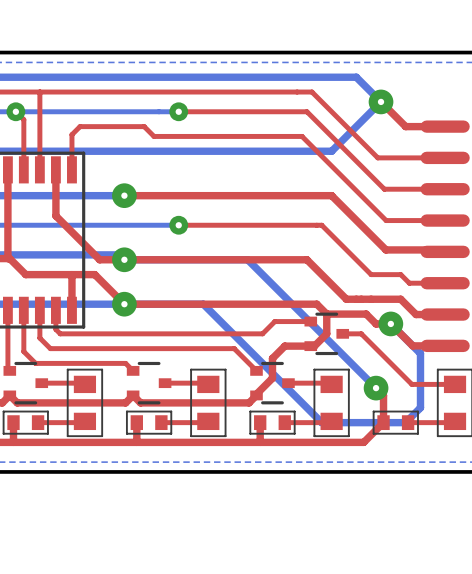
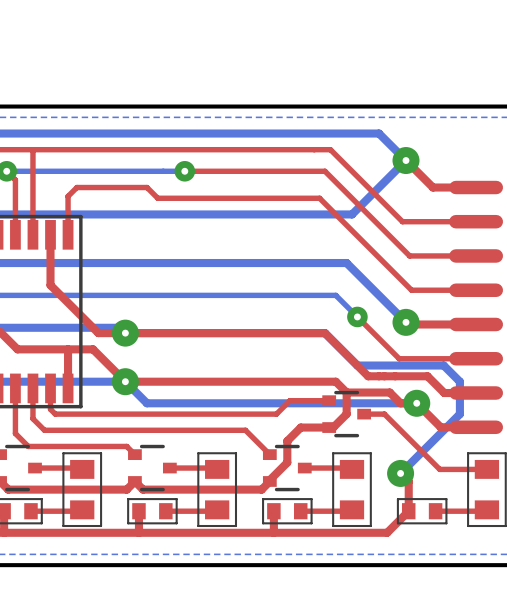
top track: (124, 195) (331, 195) (385, 249) (443, 249) (445, 251) -> (405, 322) (408, 324) (476, 324)
bottom track: none -> (125, 263) (346, 263) (405, 322)
via: (124, 195) -> none
top track: (178, 225) (321, 225) (371, 274) (400, 274) (409, 283) -> (357, 316) (399, 358) (437, 358)
bottom track: none -> (184, 295) (335, 295) (357, 316)
via: (178, 225) -> none
via: none -> (357, 316)
via: none -> (405, 322)
bottom track: (247, 259) (376, 388) -> (260, 333) (325, 333) (357, 365) (443, 365) (459, 381) (459, 414) (400, 473)
bottom track: (124, 304) (203, 304) (321, 422) (405, 422) (420, 407) (420, 353) (390, 323) -> (125, 381) (146, 403) (416, 403)

